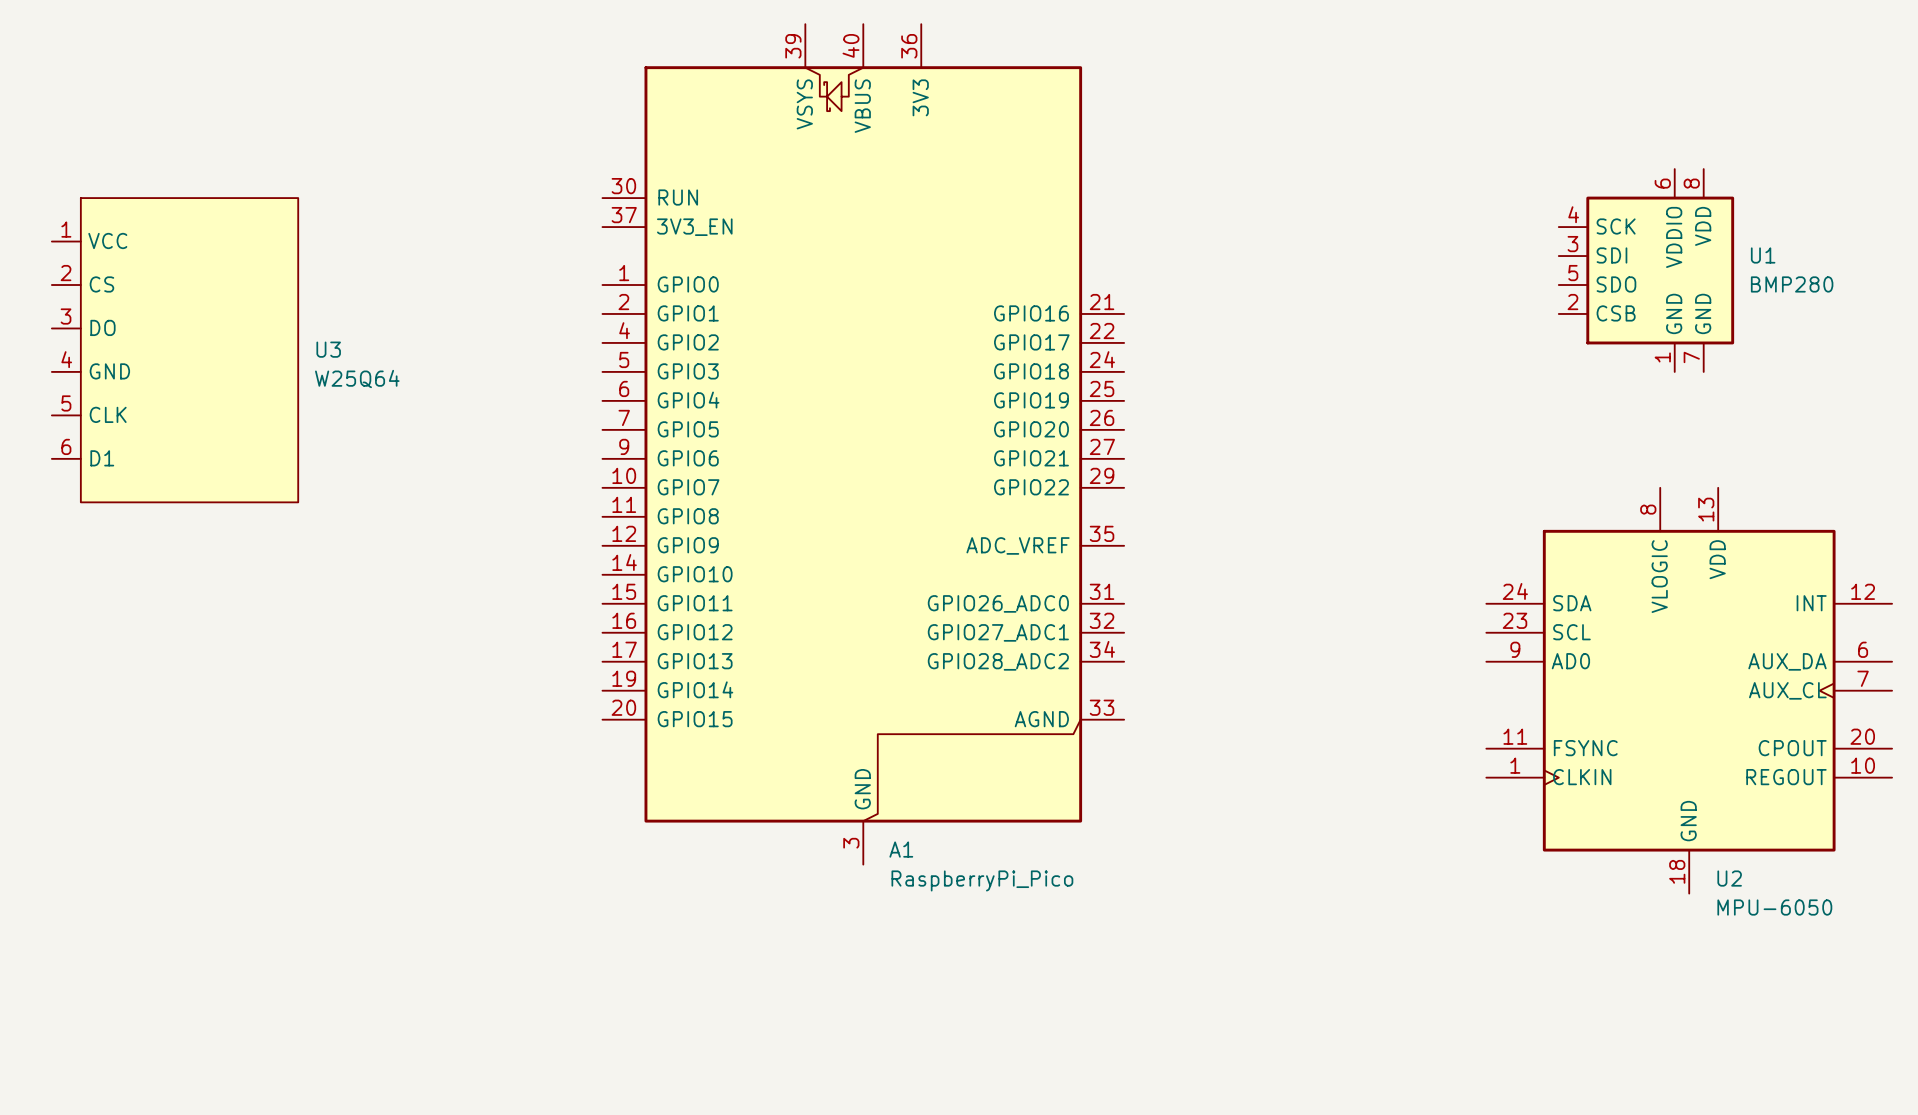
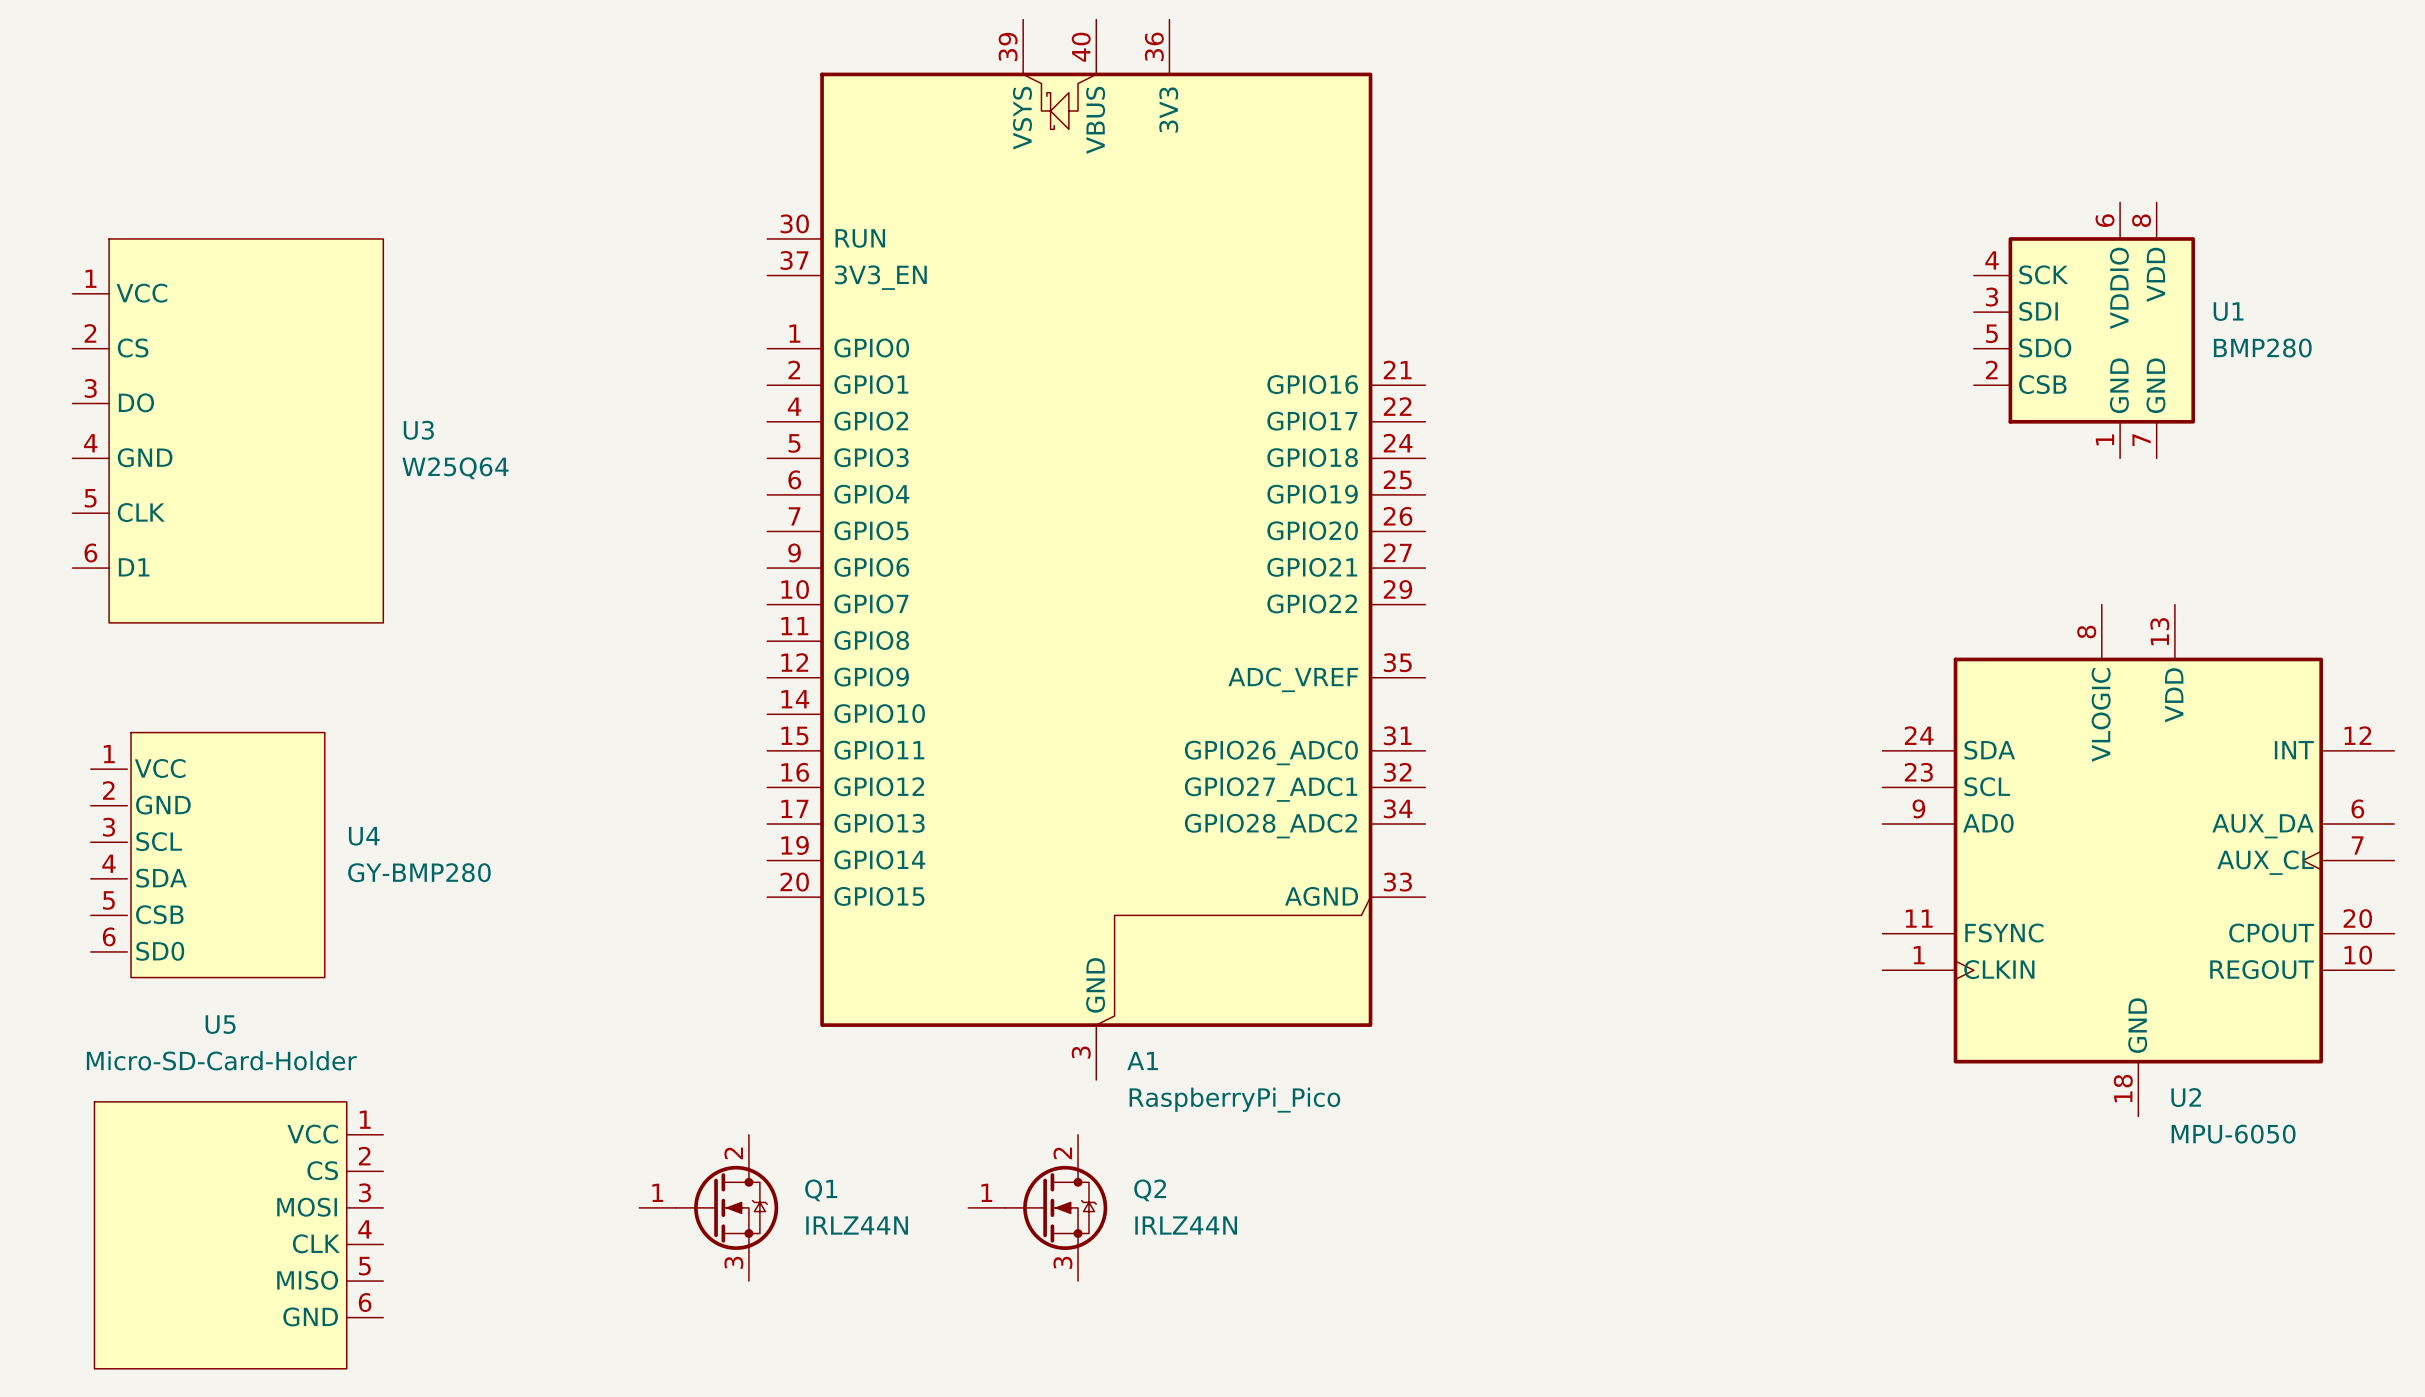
U4: none -> GY-BMP280 (207, 855)
Q1: none -> IRLZ44N (708, 1207)
Q2: none -> IRLZ44N (1037, 1207)
U5: none -> Micro-SD-Card-Holder (238, 1235)

